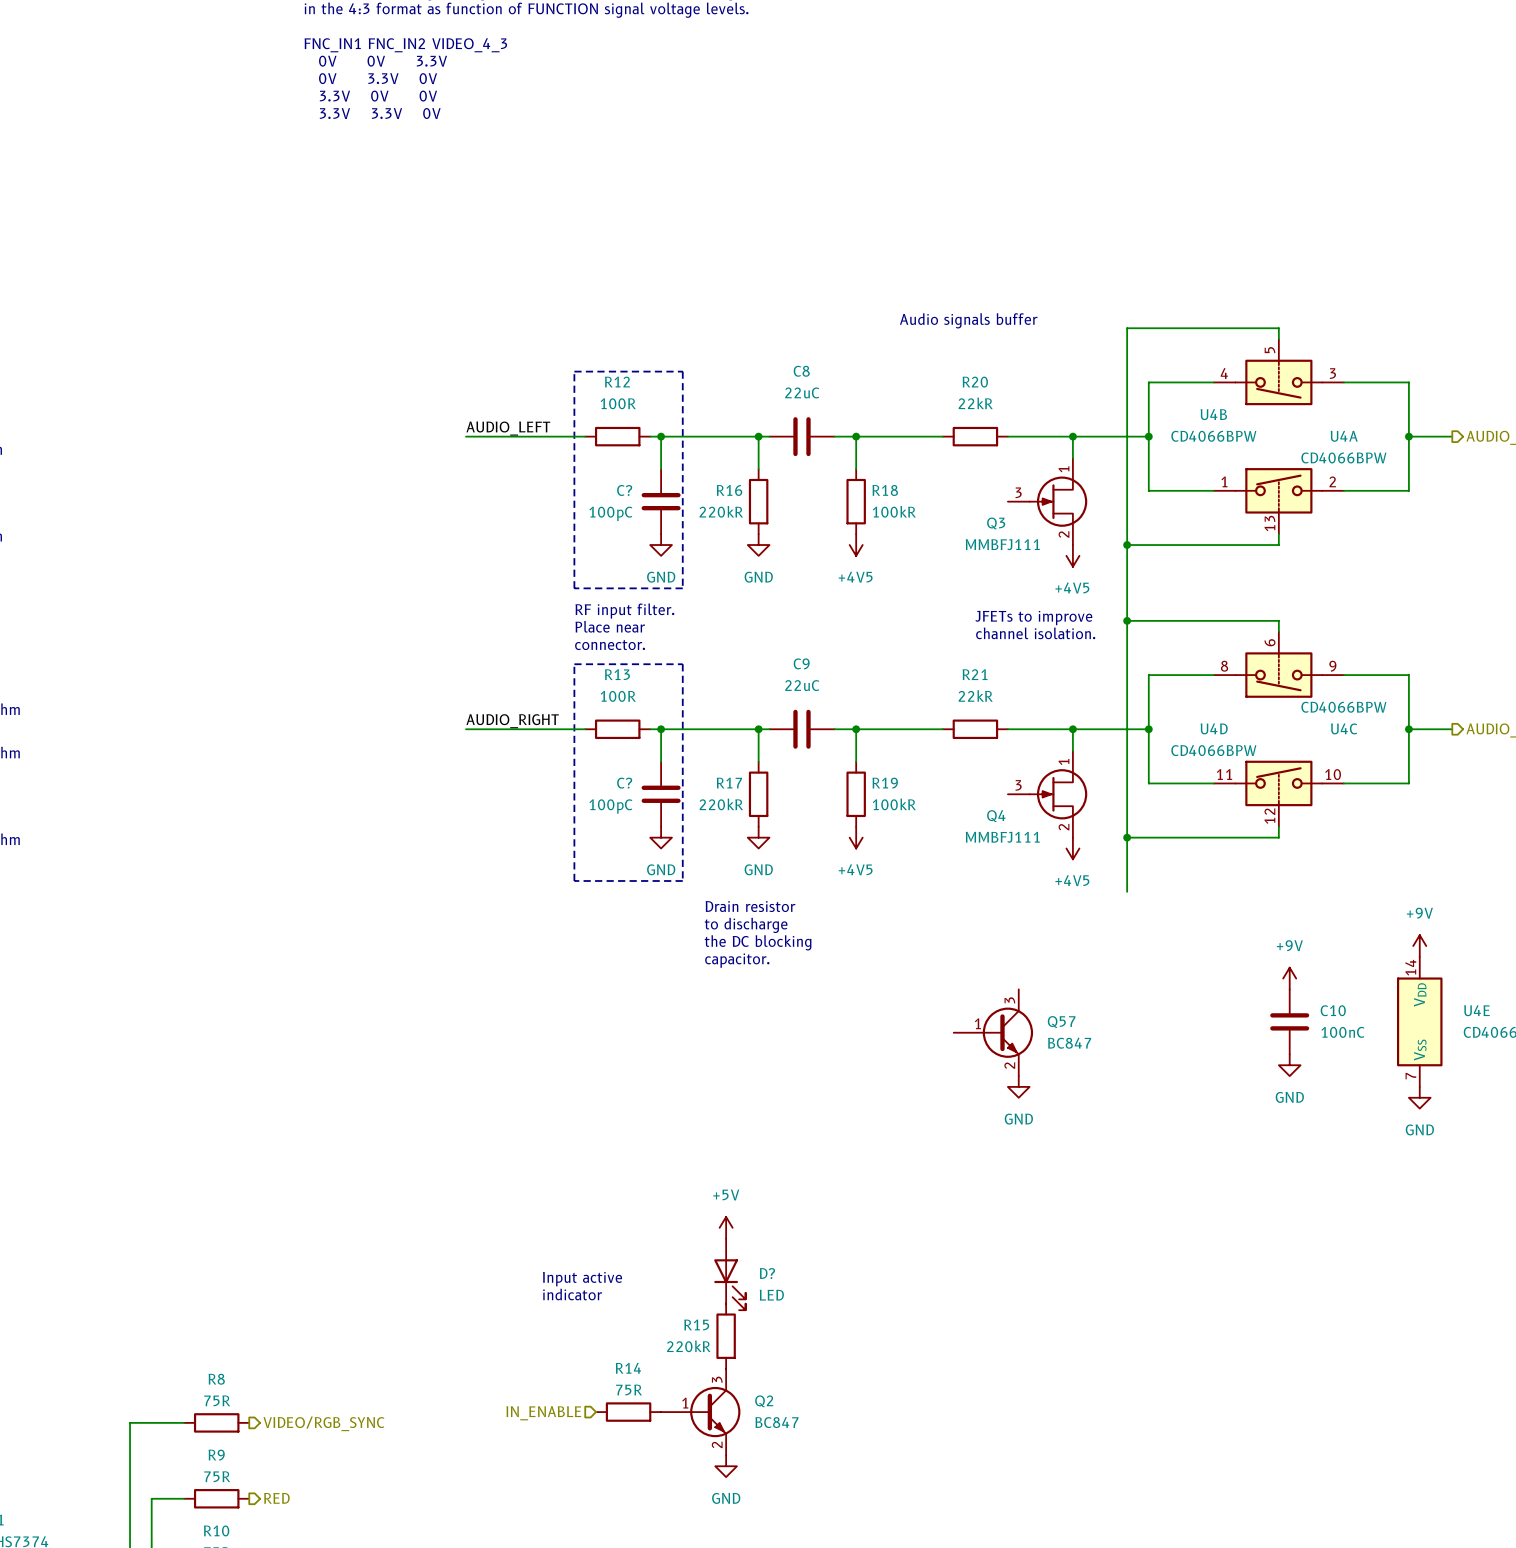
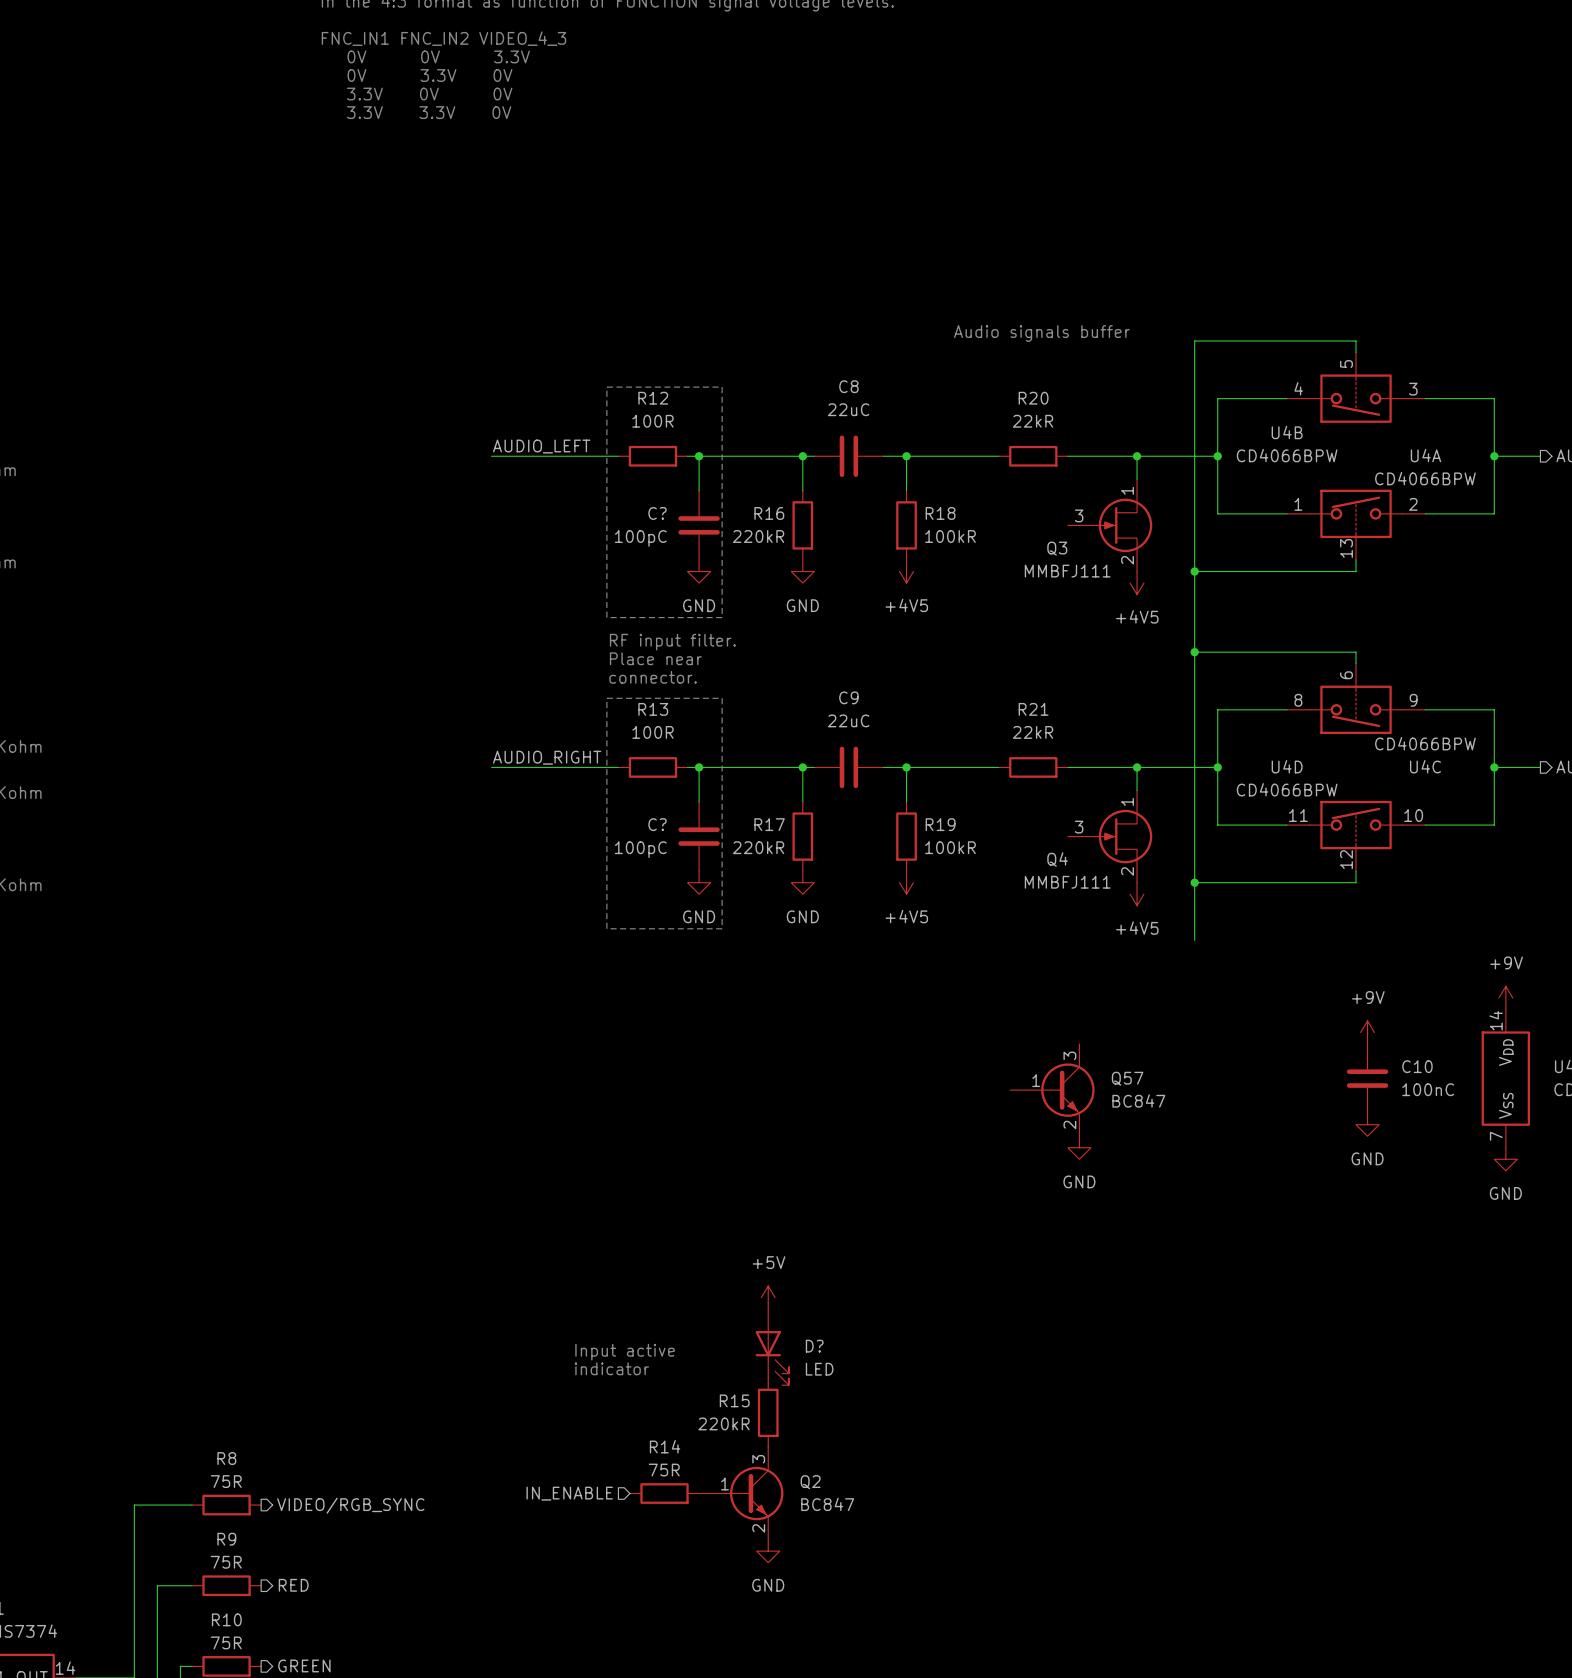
text: JFETs to improve (1033, 618) -> none
text: channel isolation. (1035, 633) -> none
text: Drain resistor (750, 906) -> none
text: to discharge (746, 925) -> none
text: the DC blocking (758, 942) -> none
text: capacitor. (737, 960) -> none

